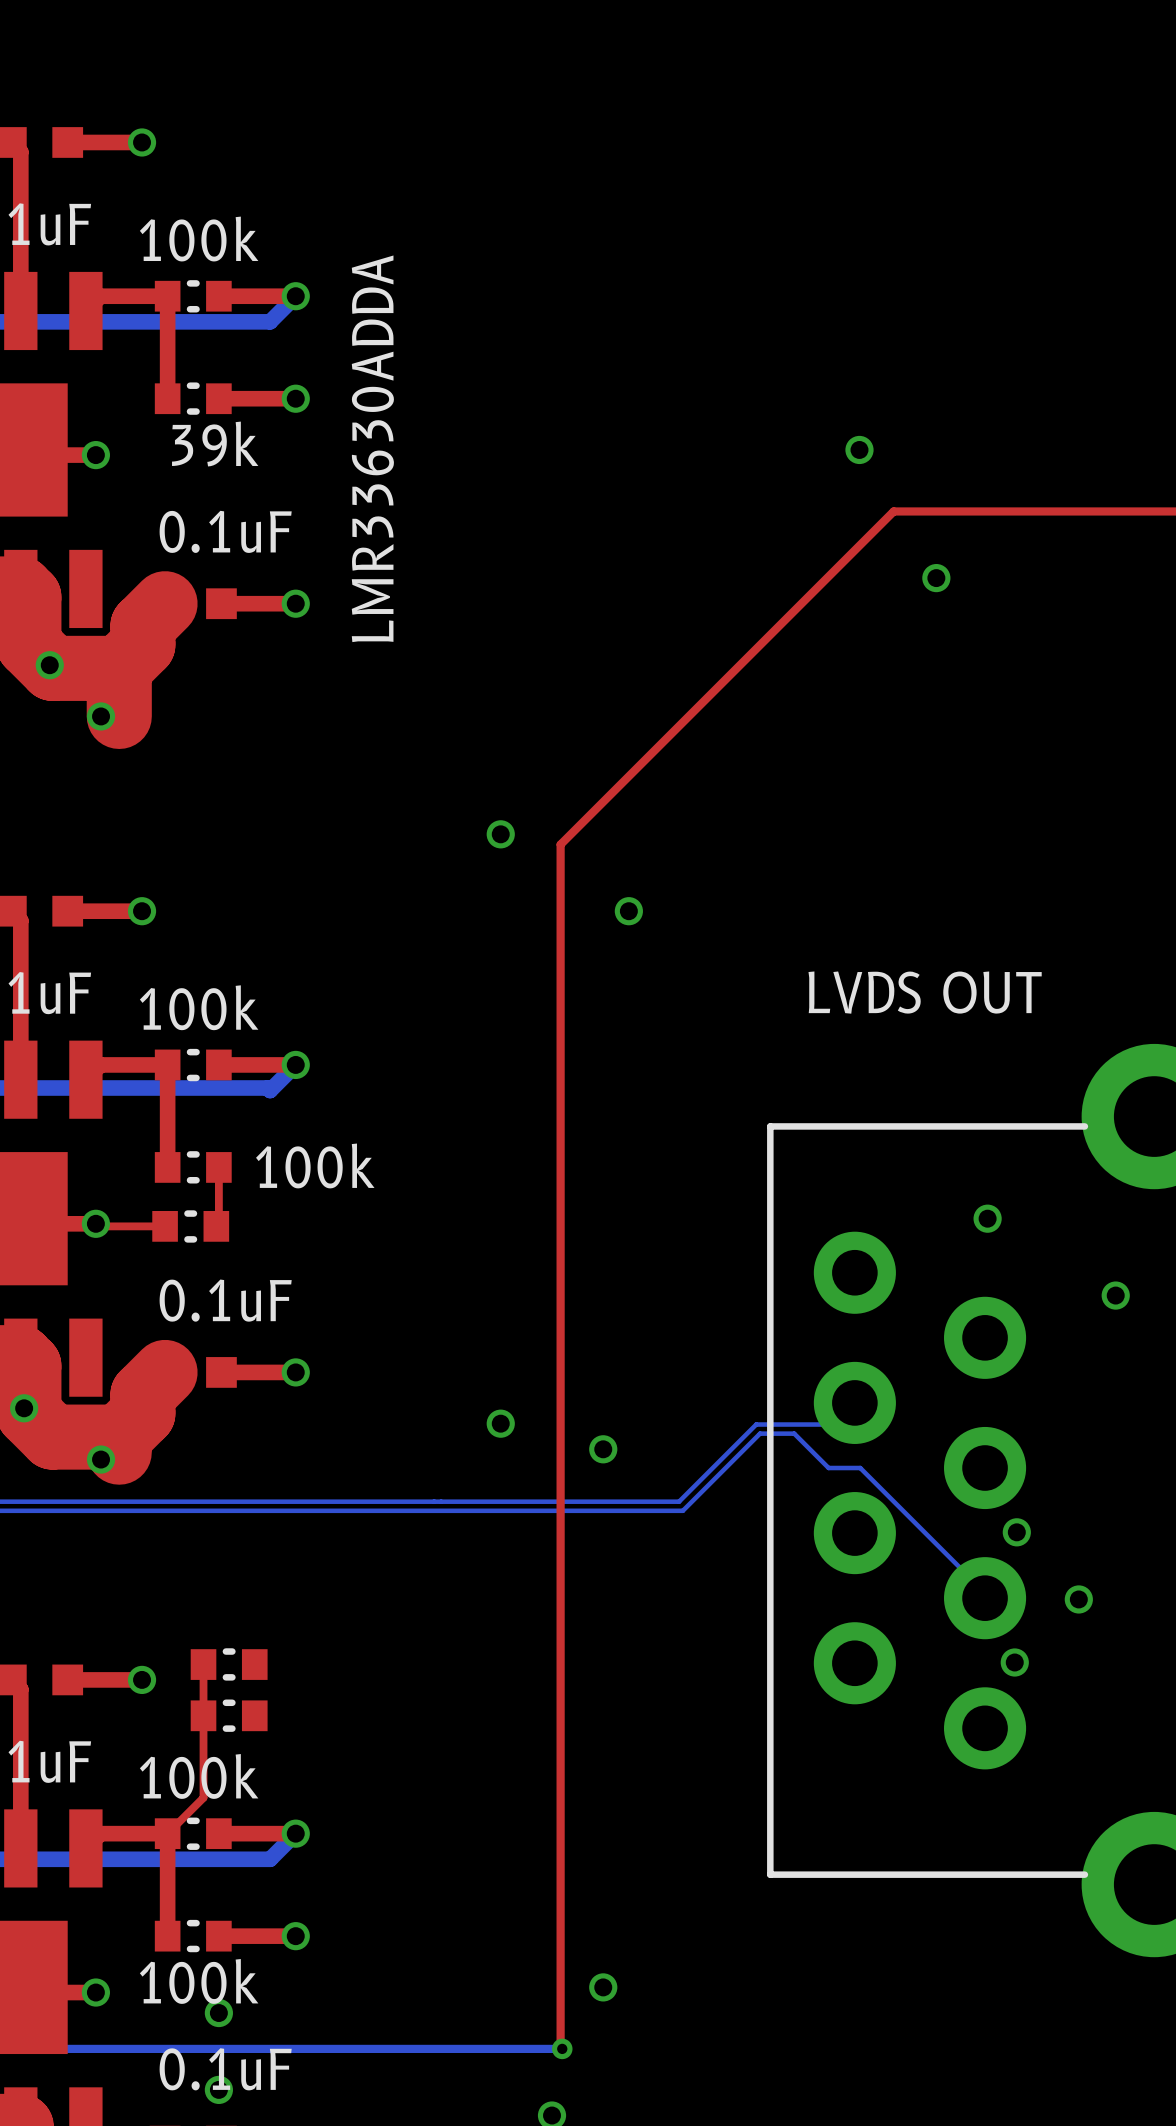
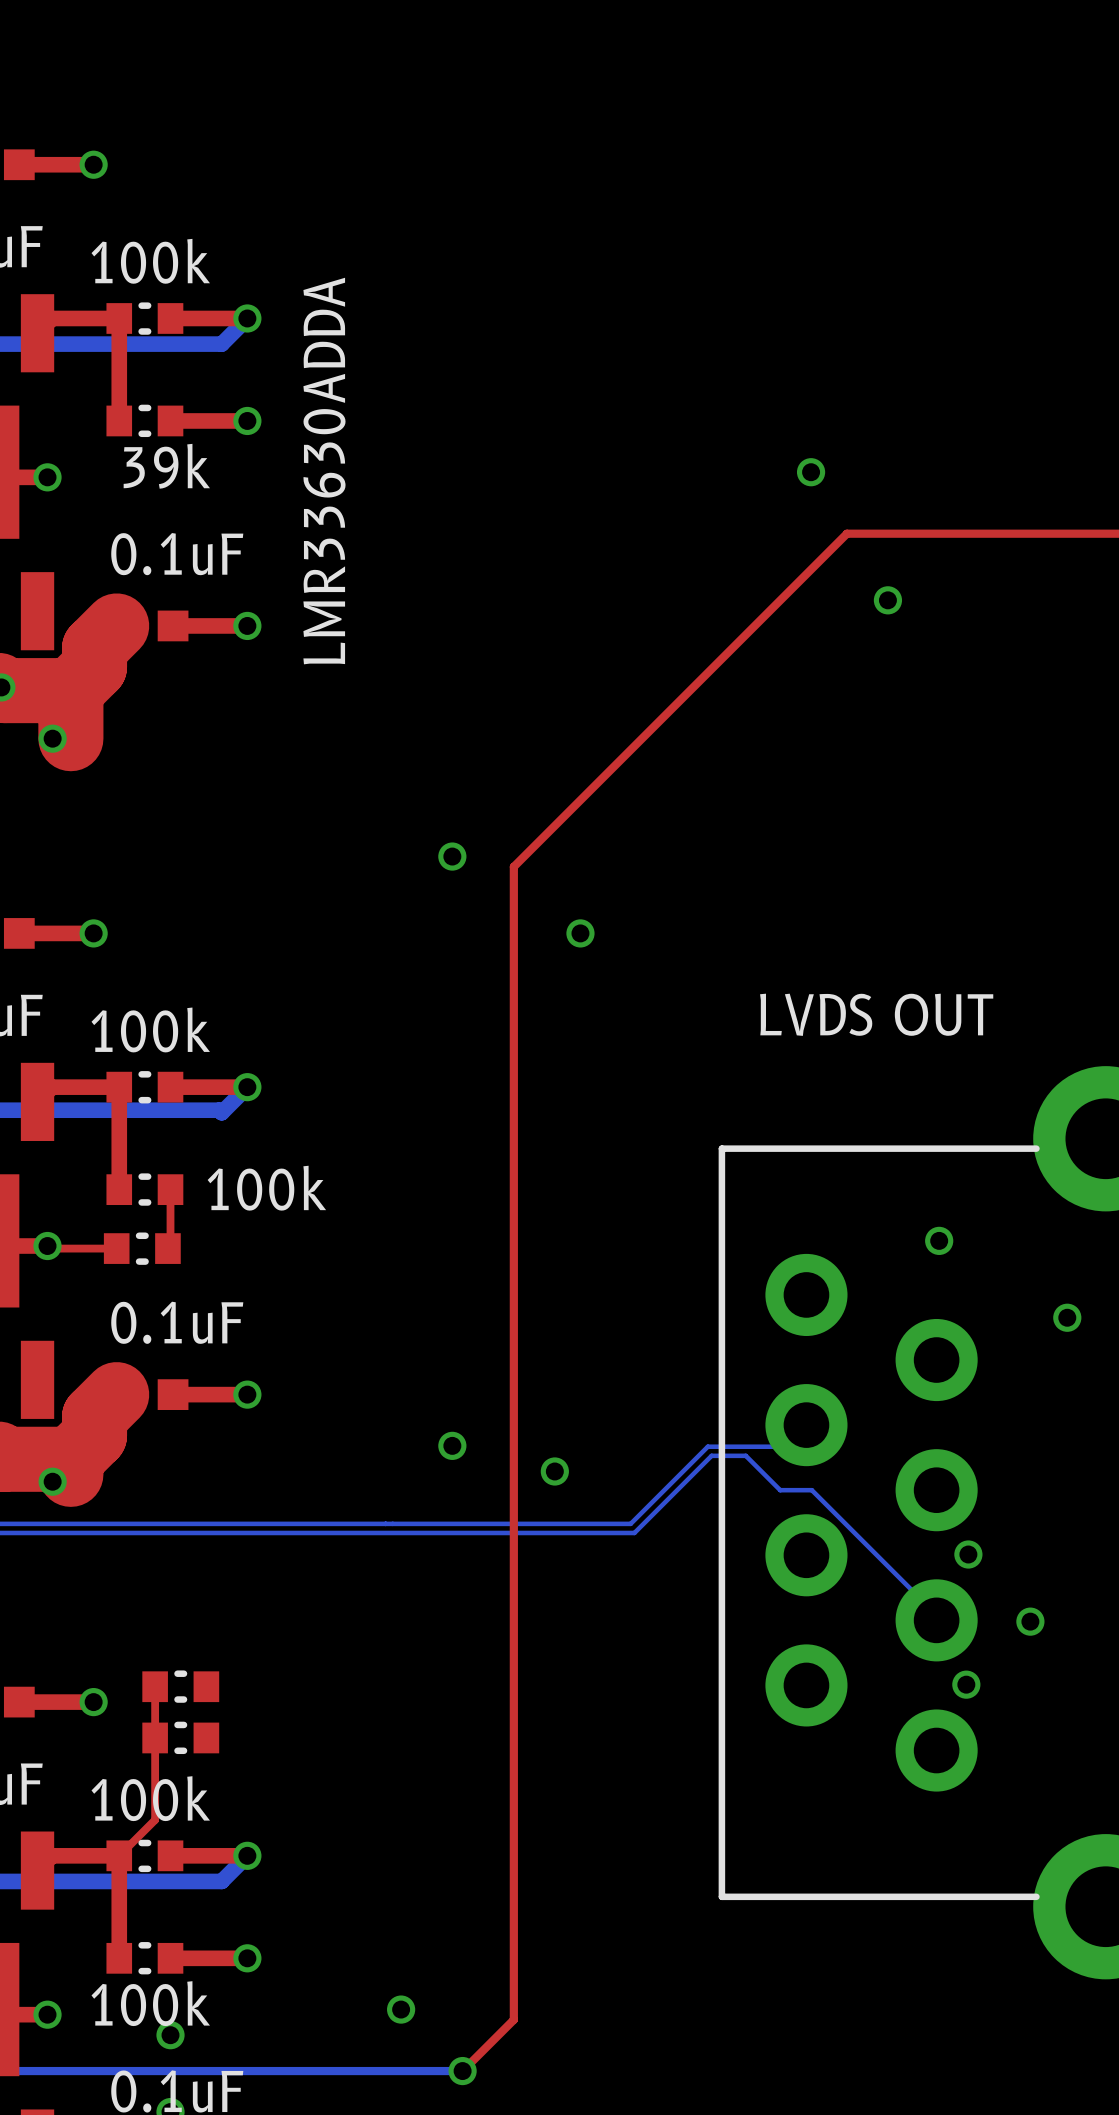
top track: (895, 511) (560, 844) (560, 2047) (562, 2048) -> (846, 533) (513, 866) (513, 2019) (462, 2071)
via: none -> (401, 2009)
via: (603, 1987) -> none
bottom track: (511, 2048) (562, 2048) -> none
via: none -> (462, 2071)
via: (562, 2048) -> none

